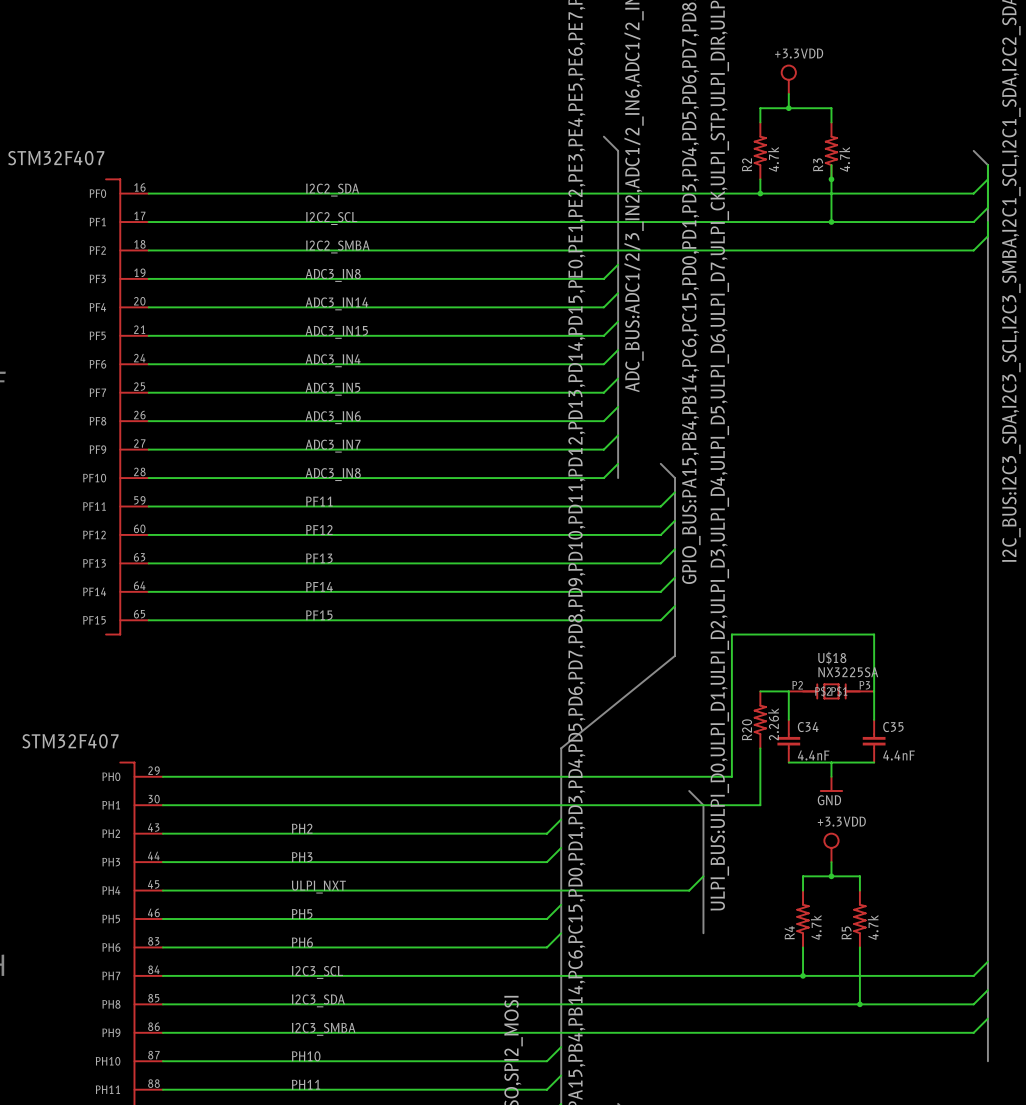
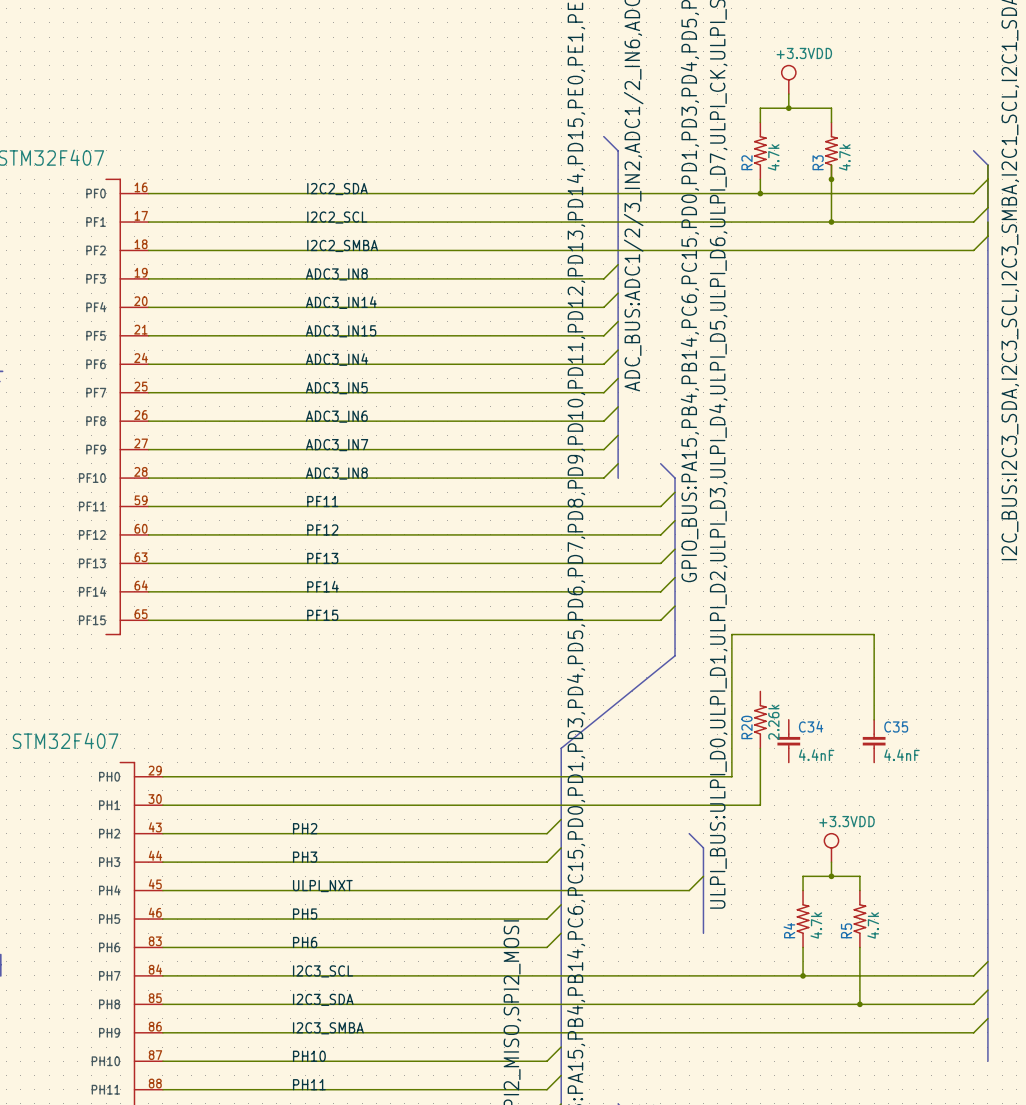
wire: (760, 691) (788, 691) (788, 719) -> none
U$18: NX3225SA (831, 691) -> none
wire: (788, 762) (874, 762) -> none
wire: (831, 762) (831, 776) -> none
power symbol: GND (831, 784) -> none
bus: (689, 790) (703, 805) (703, 847) -> (689, 833) (703, 847)

